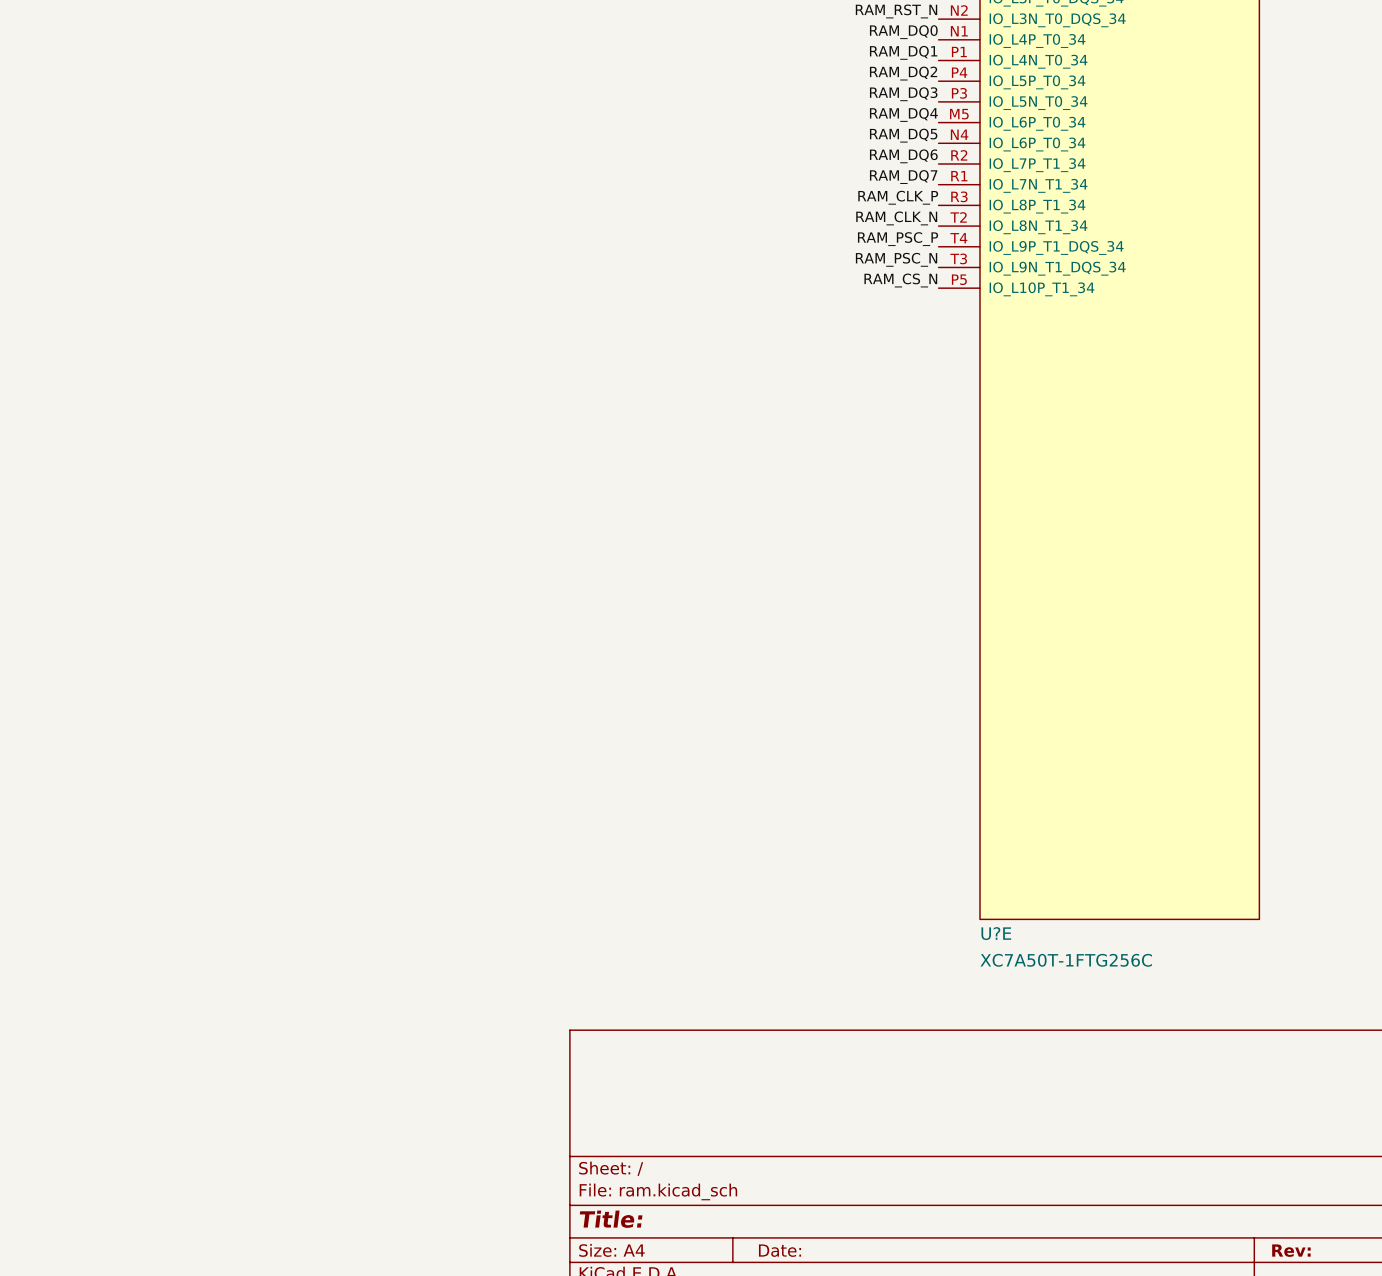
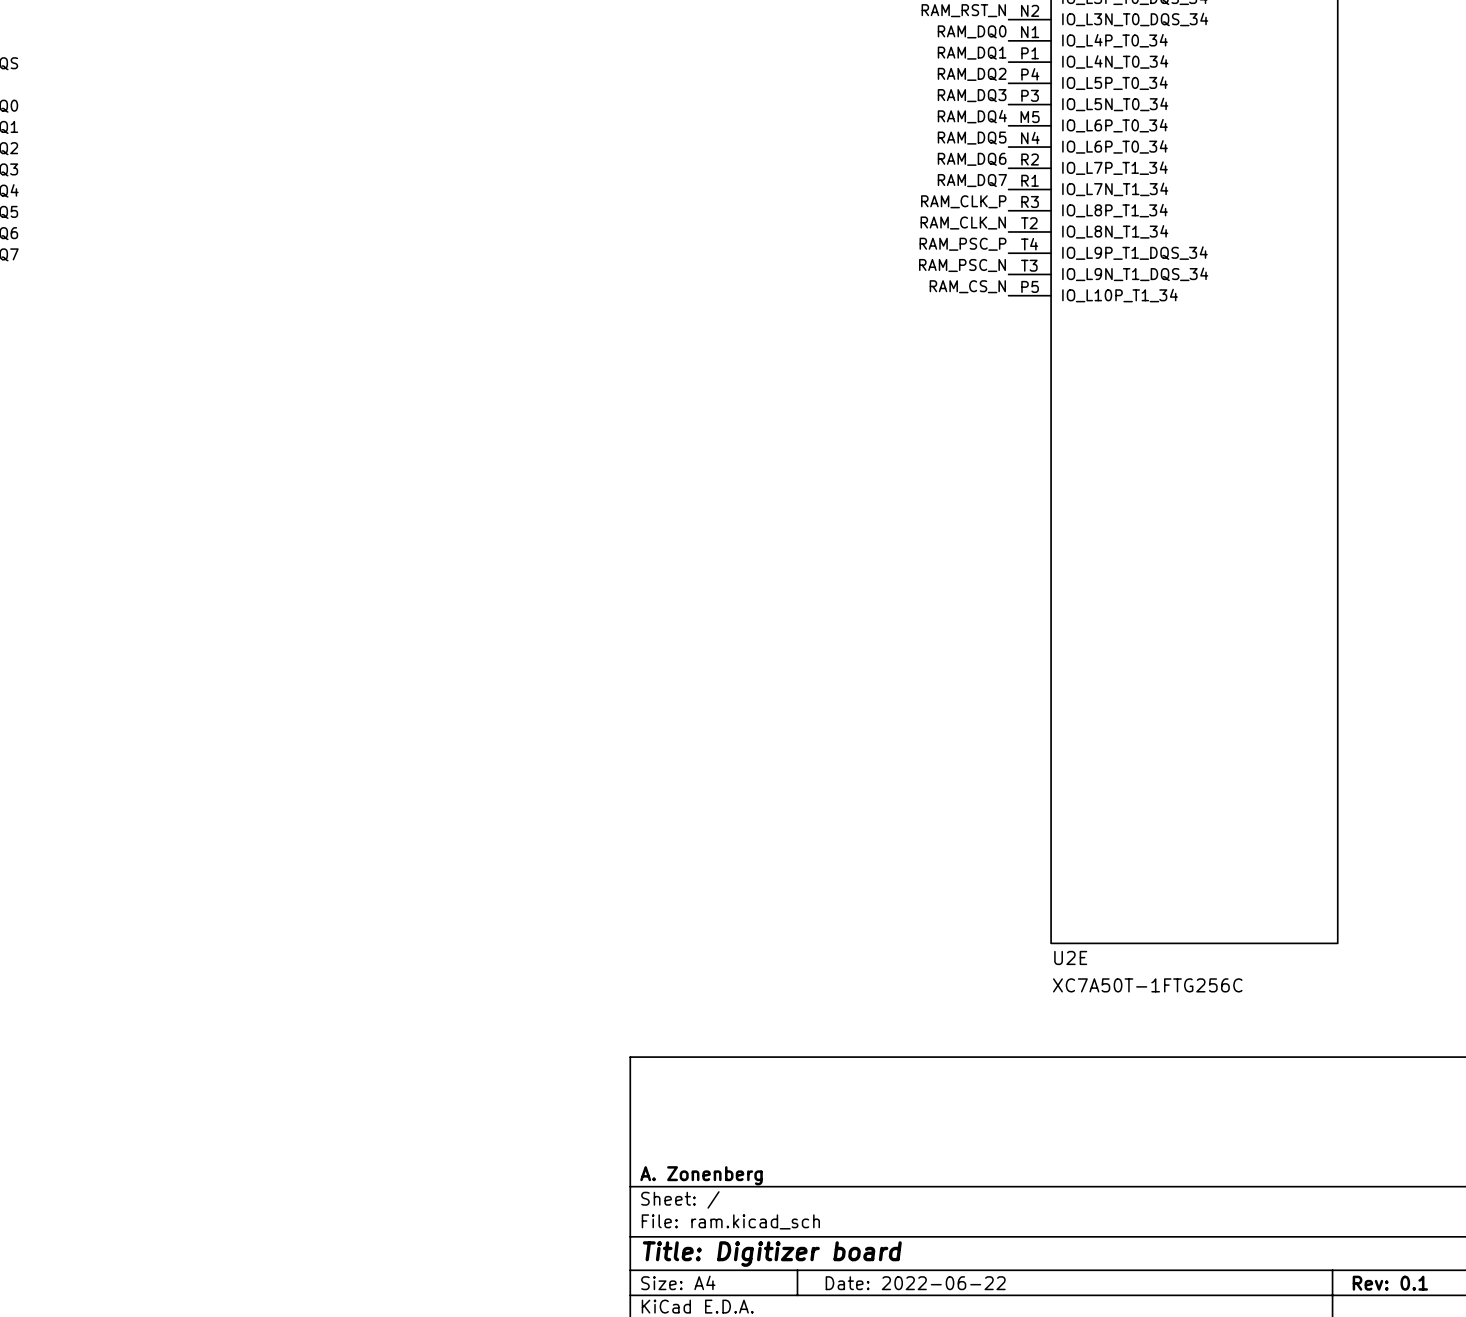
U?E name: U?E (996, 933) -> U2E (1070, 957)
title block: none -> A. Zonenberg (701, 1175)
title block: Title: (611, 1219) -> Title: Digitizer board (772, 1254)
title block: Date: (780, 1250) -> Date: 2022-06-22 (915, 1283)
title block: Rev: (1291, 1250) -> Rev: 0.1 (1390, 1283)

